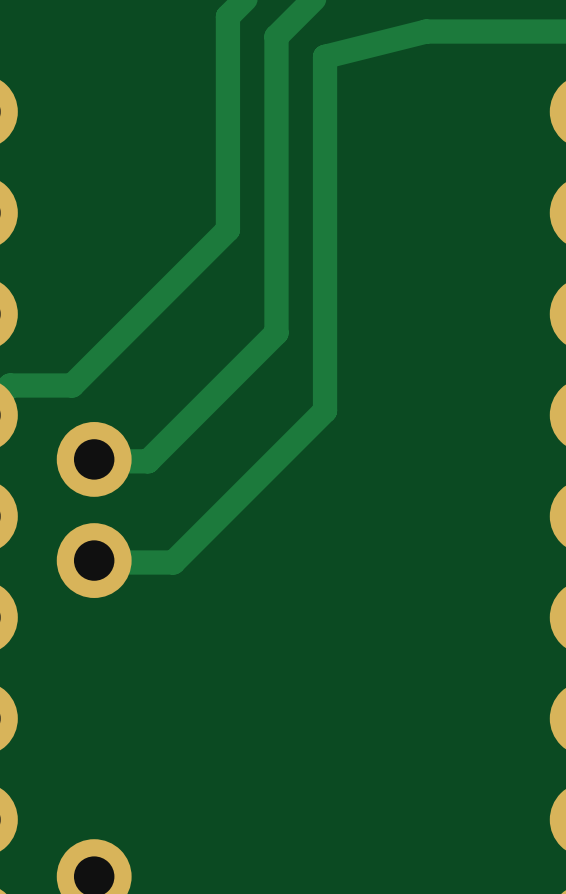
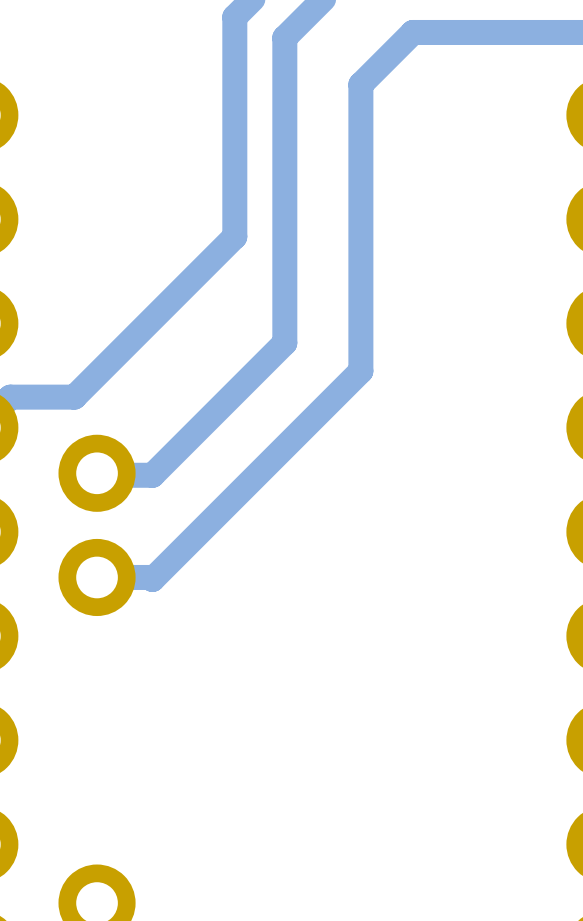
track: (426, 31) (325, 56) (325, 410) (173, 562) (96, 562) (94, 560) -> (439, 32) (412, 32) (360, 84) (360, 371) (152, 579) (150, 577) (97, 577)

